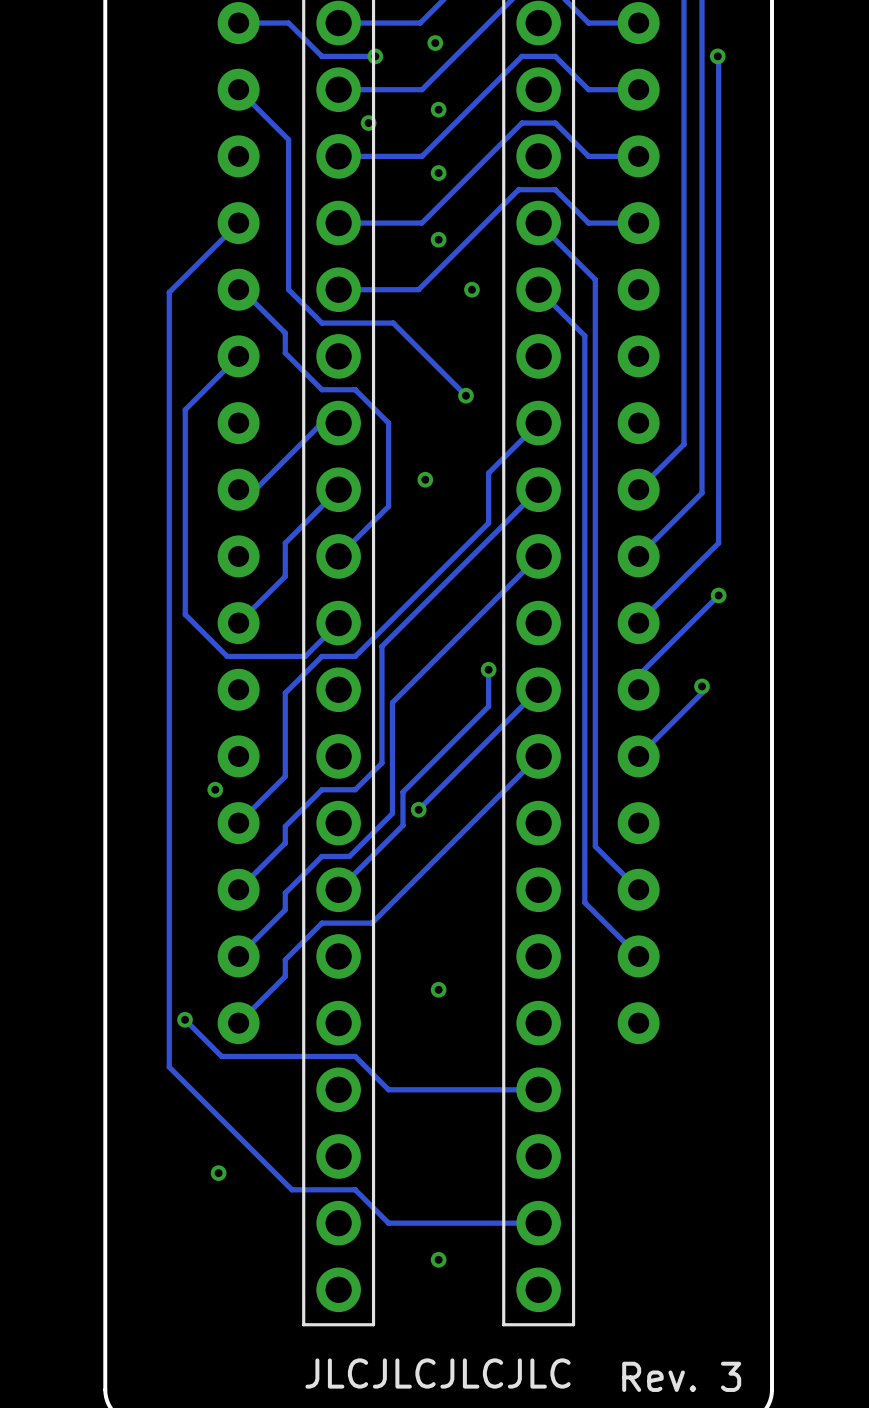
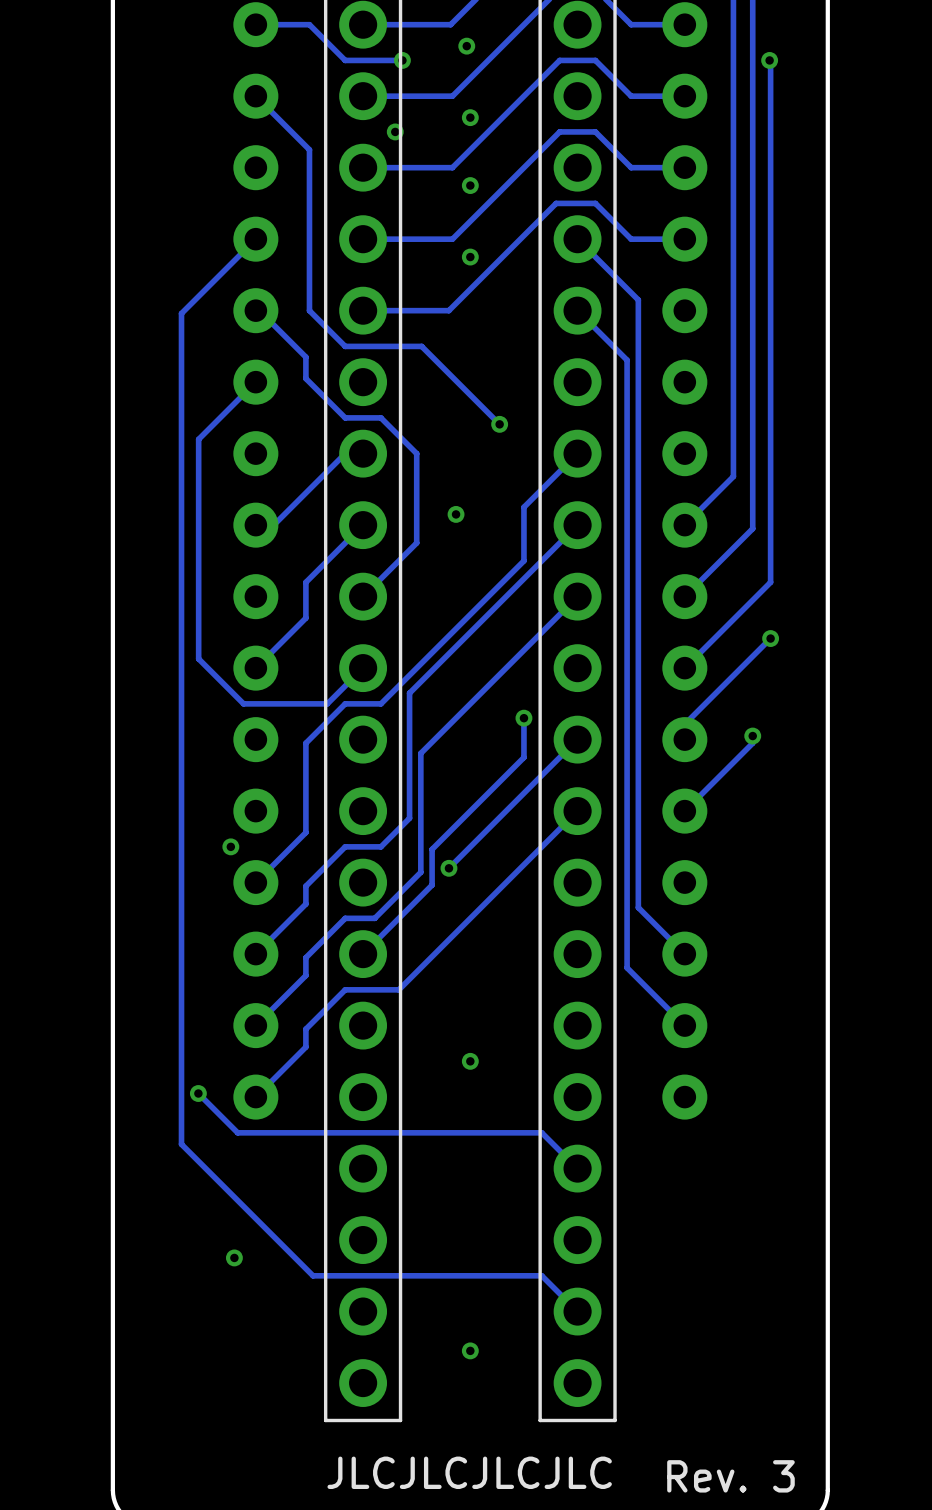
via: (471, 289) -> none
track: (355, 1056) (388, 1089) (538, 1089) -> (380, 1132) (541, 1132) (577, 1168)
track: (355, 1189) (388, 1223) (538, 1223) -> (380, 1275) (541, 1275) (577, 1311)

